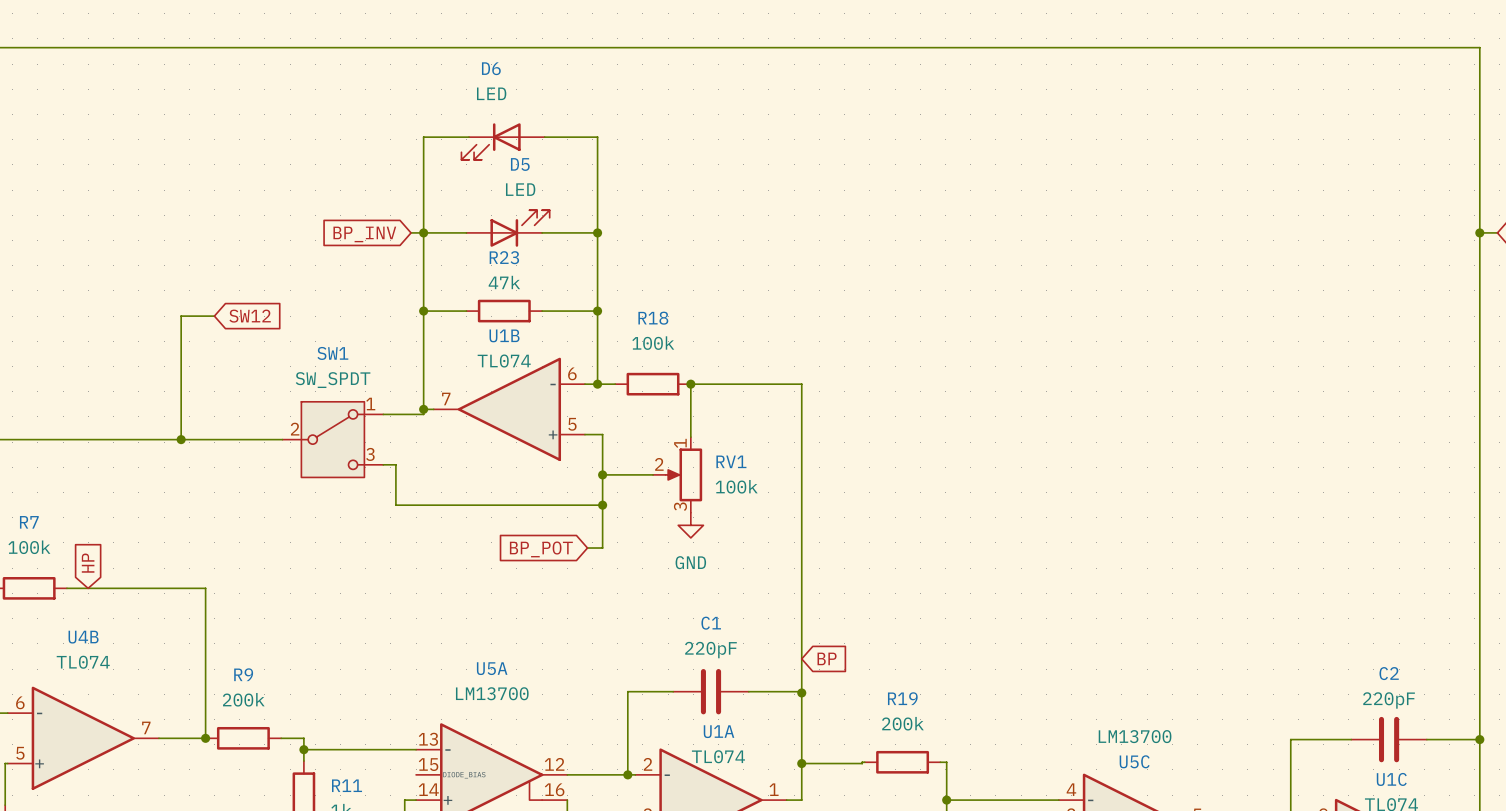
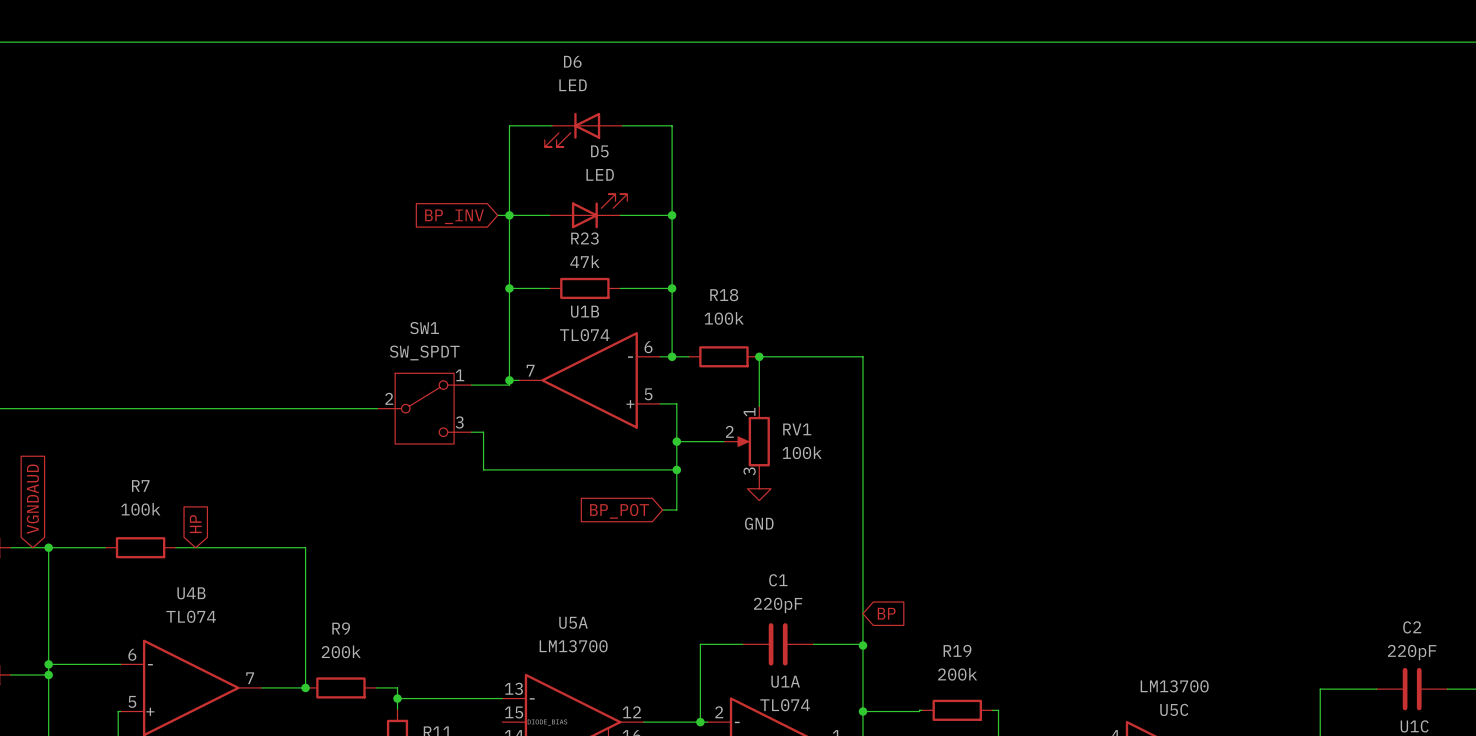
wire: (214, 316) (181, 316) (181, 439) -> none
global label: SW12 (250, 316) -> none
junction: (181, 439) -> none

